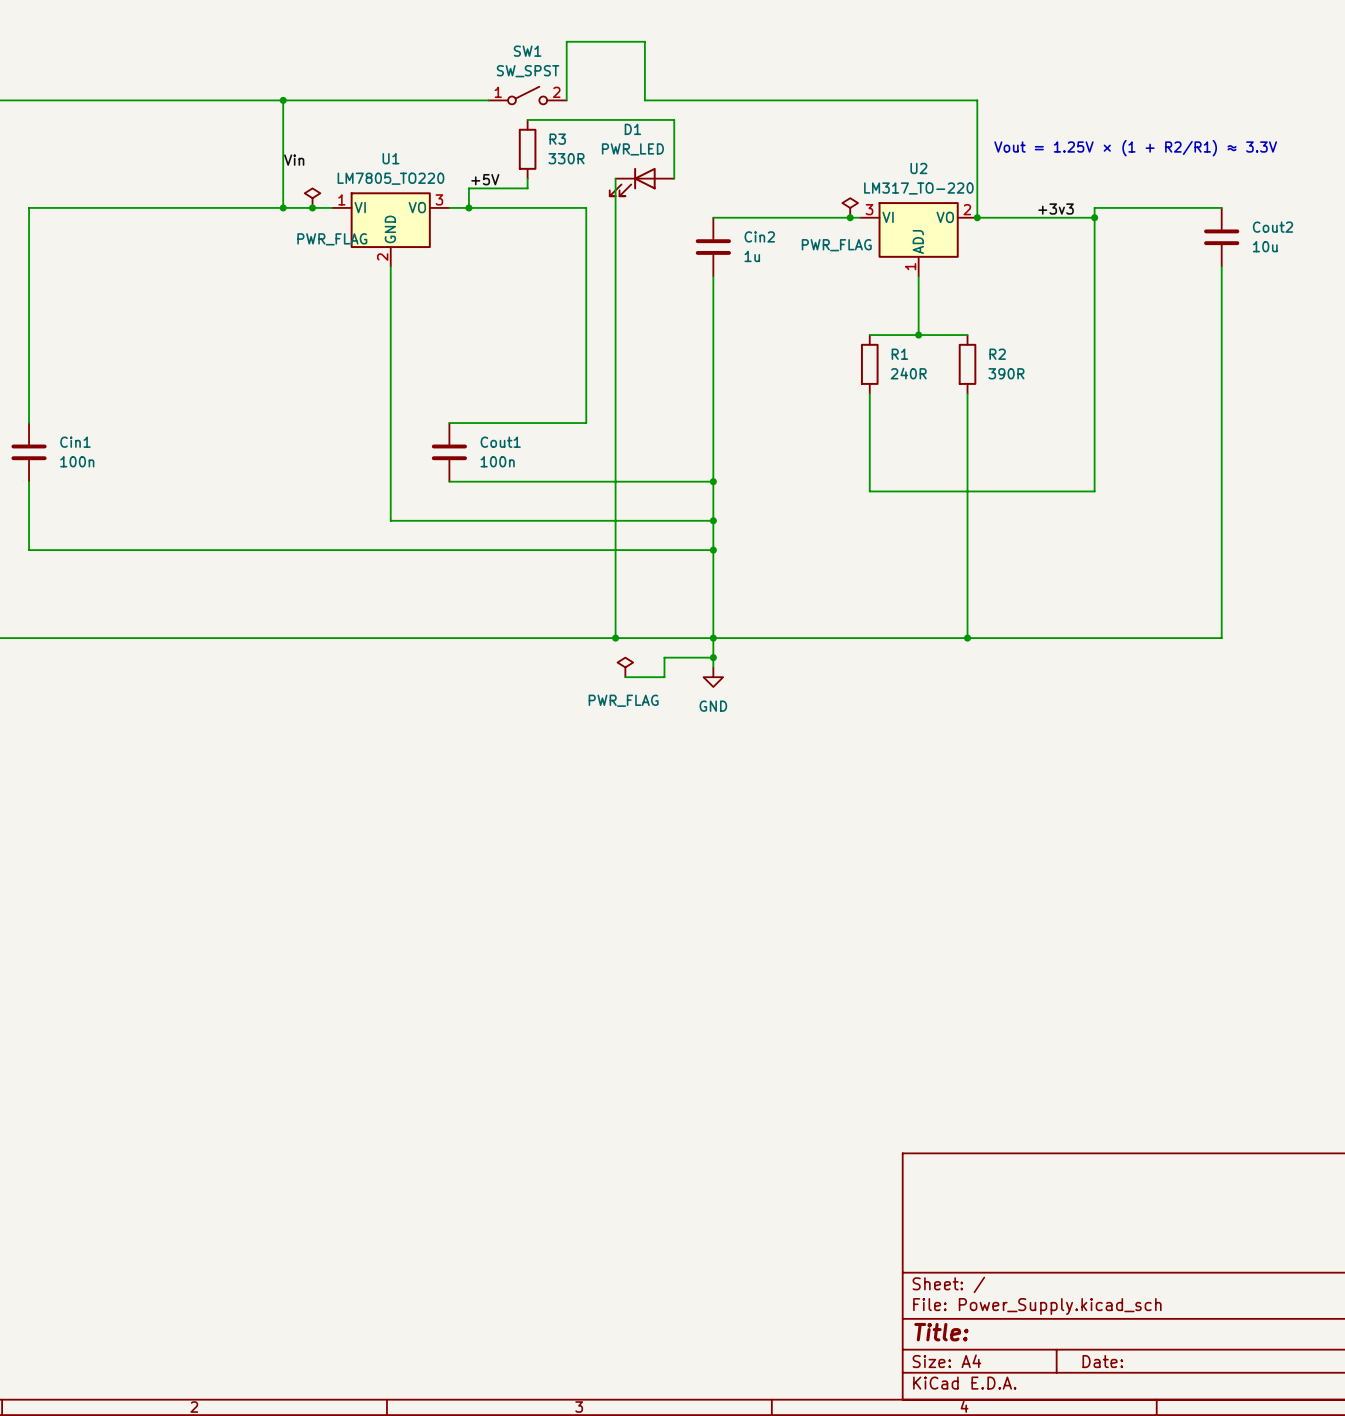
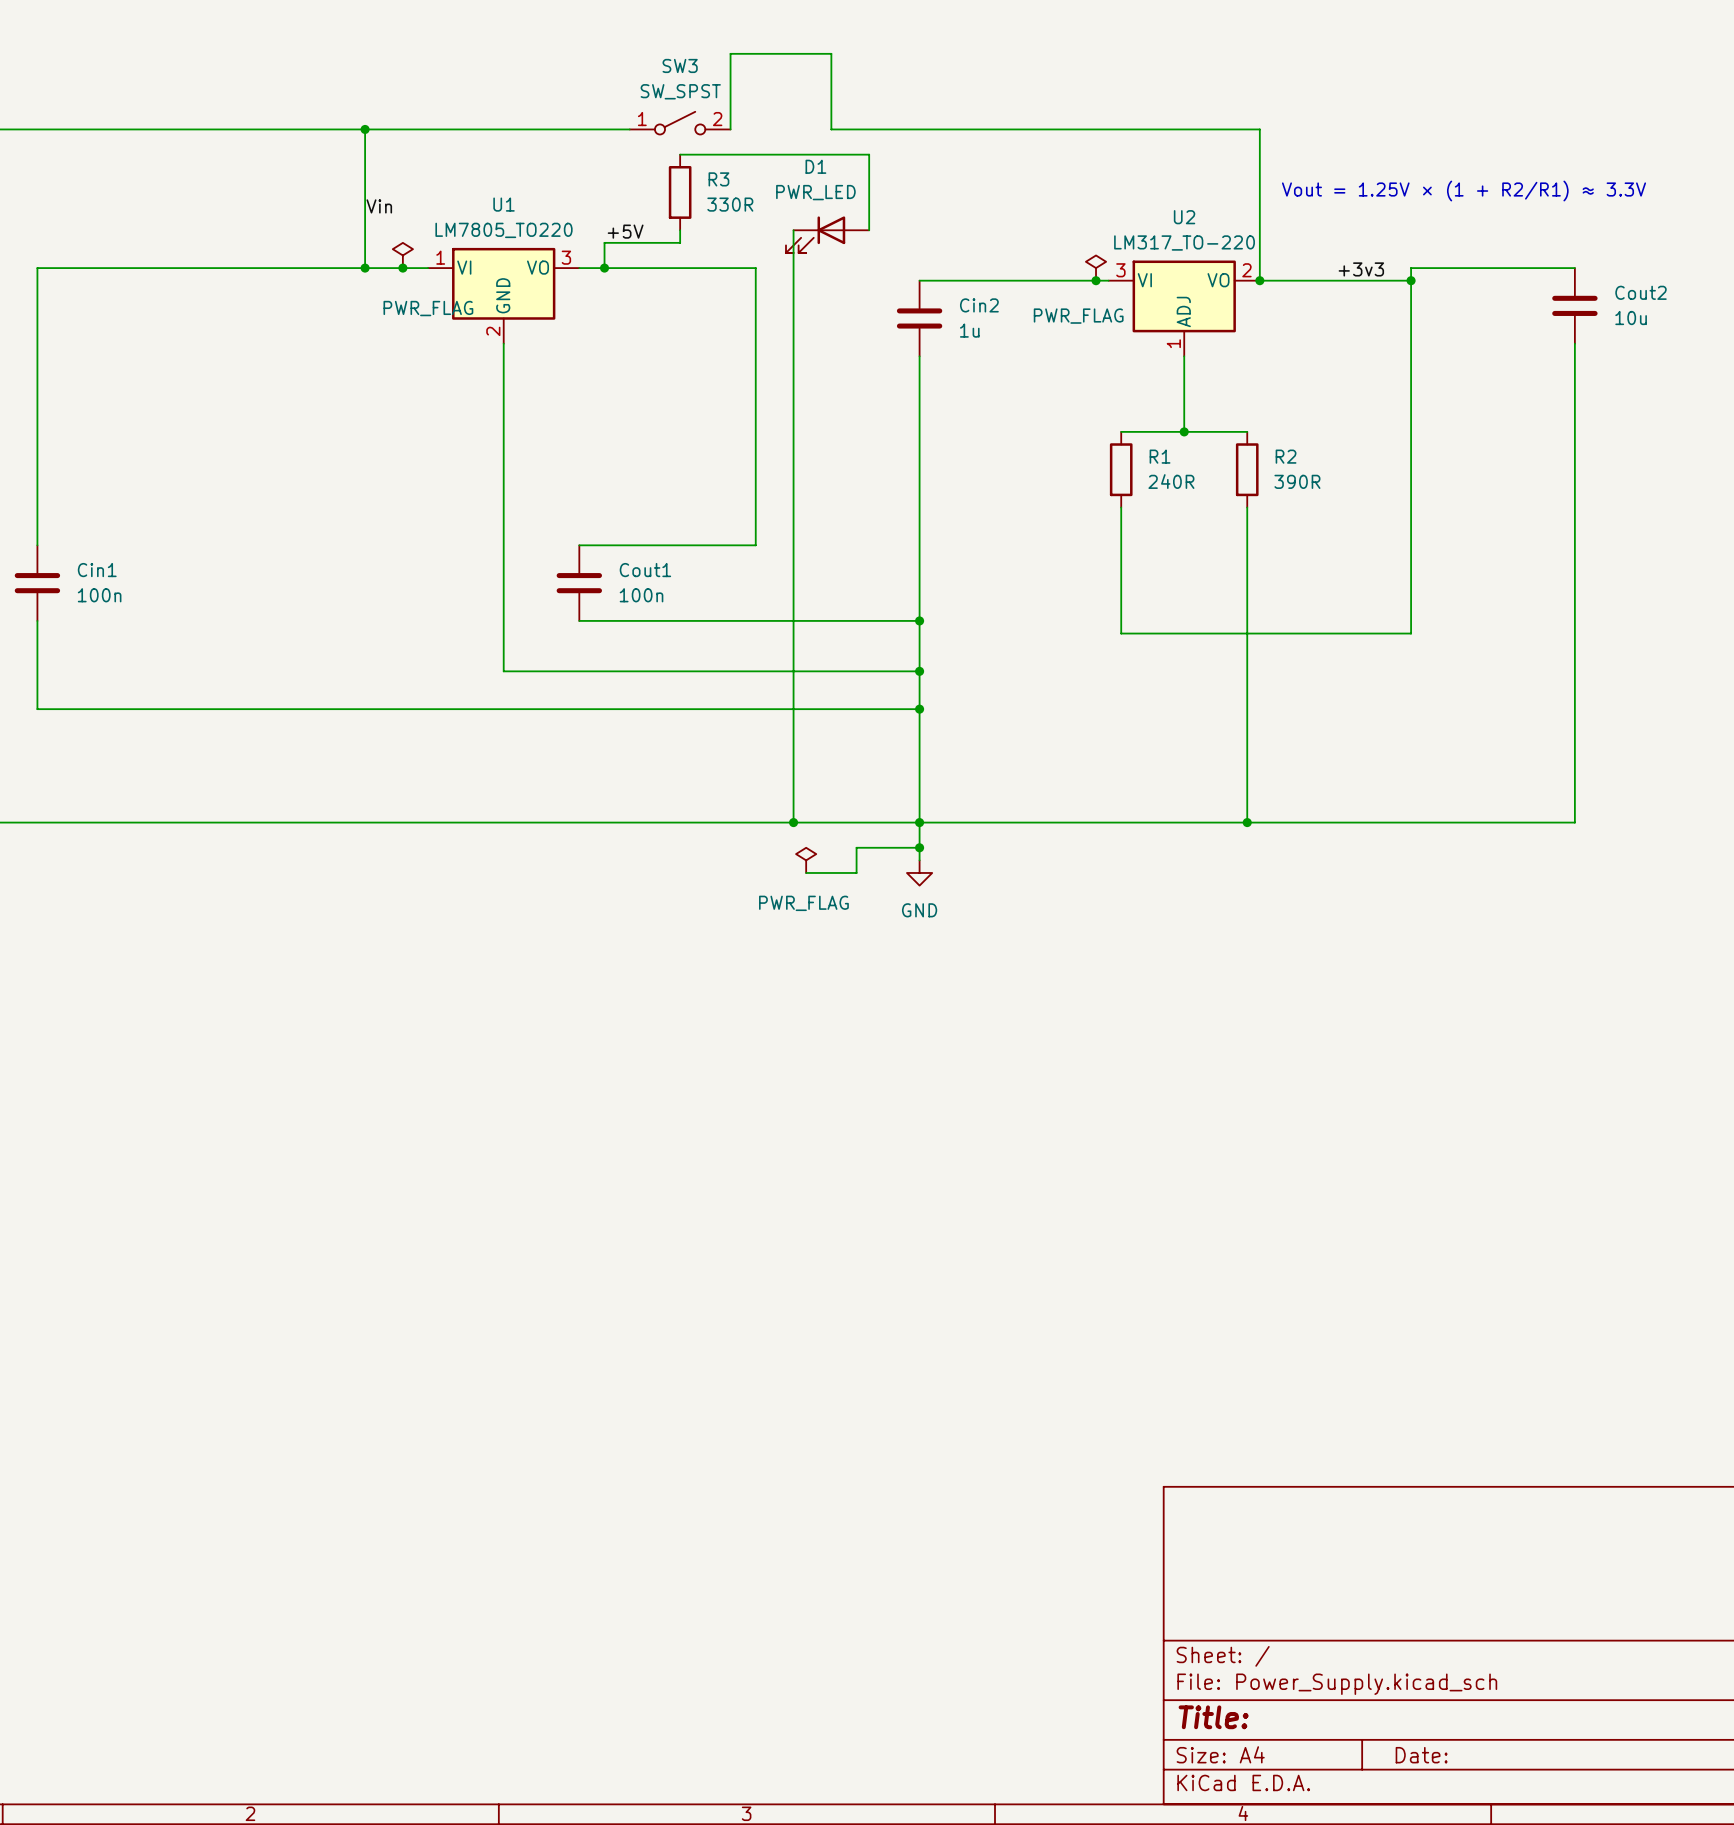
SW1 name: SW1 (527, 51) -> SW3 (680, 65)

